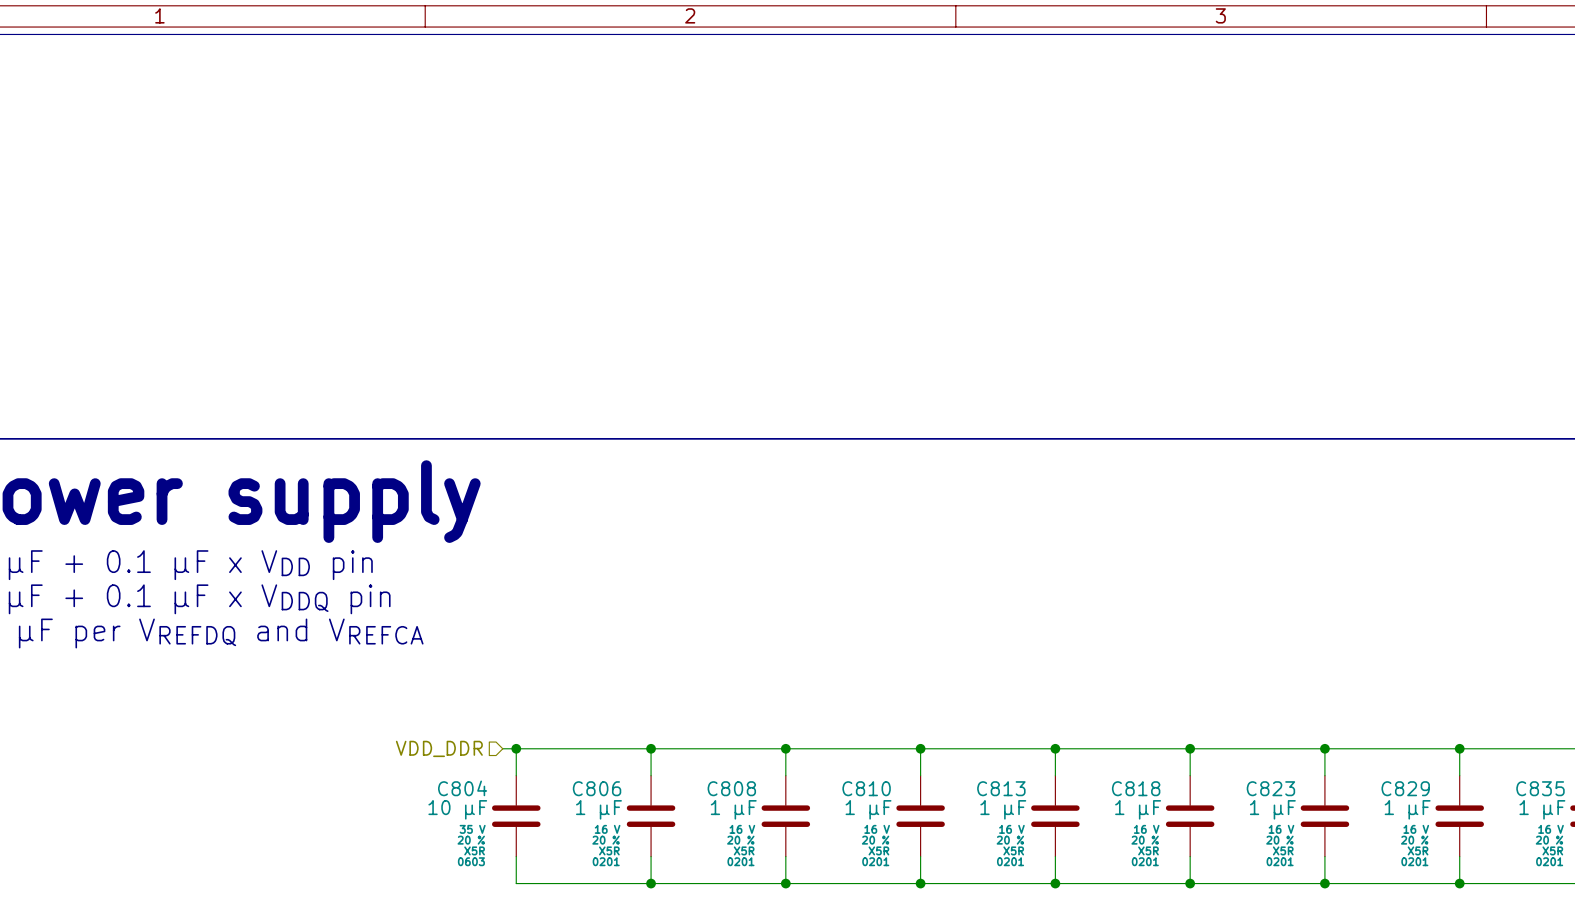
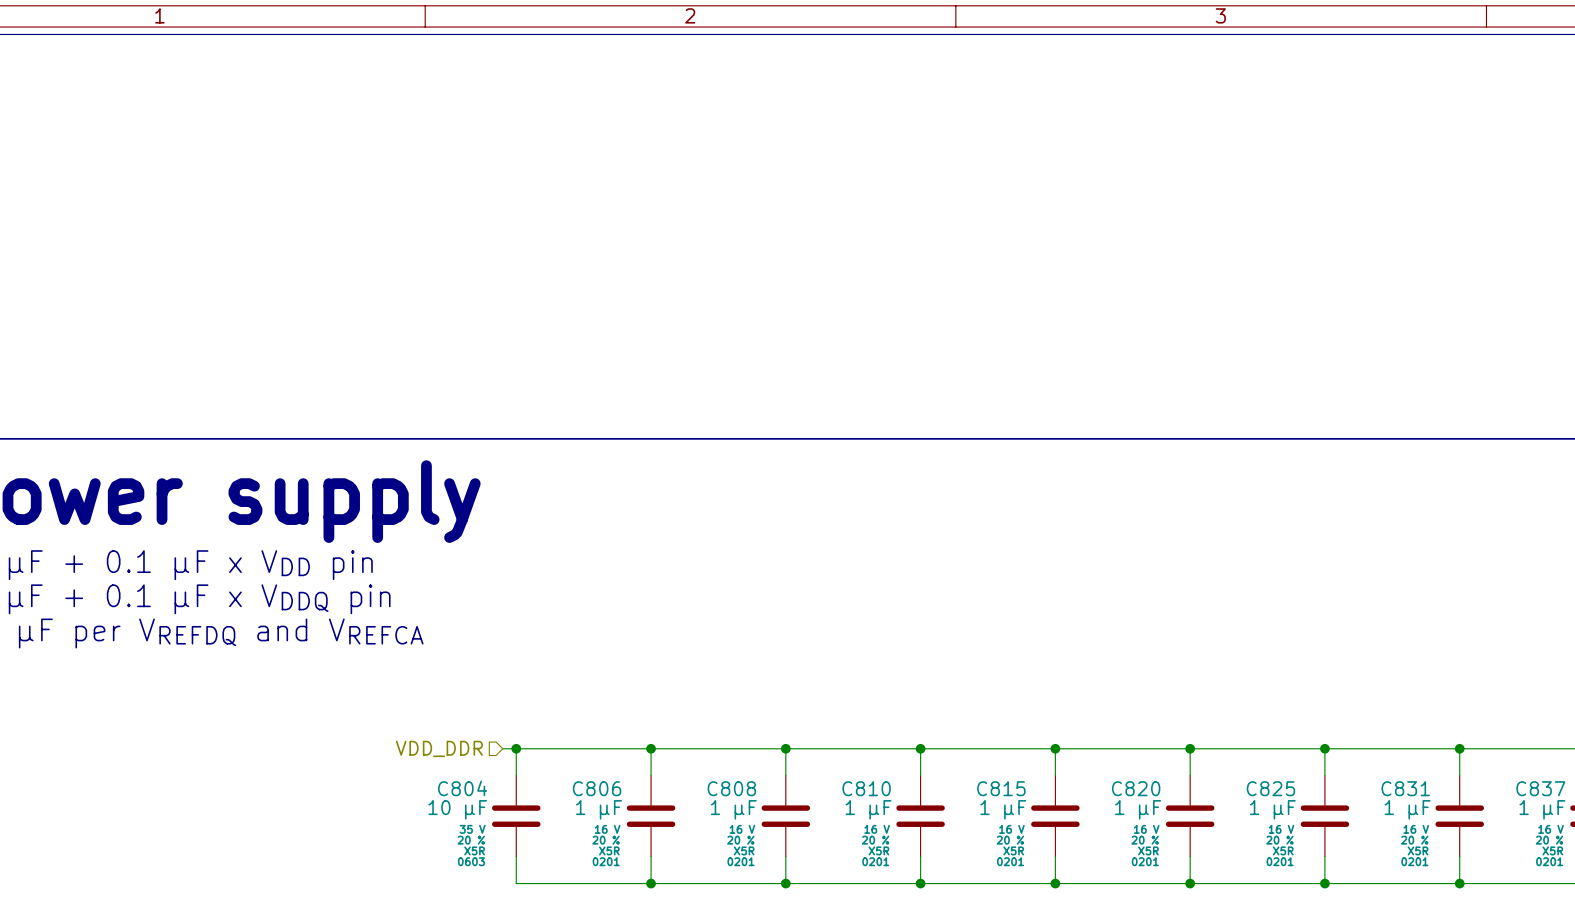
C813 name: C813 (1001, 788) -> C815 (1001, 788)
C818 name: C818 (1136, 788) -> C820 (1136, 788)
C823 name: C823 (1270, 788) -> C825 (1270, 788)
C829 name: C829 (1405, 788) -> C831 (1405, 788)
C835 name: C835 (1540, 788) -> C837 (1540, 788)

